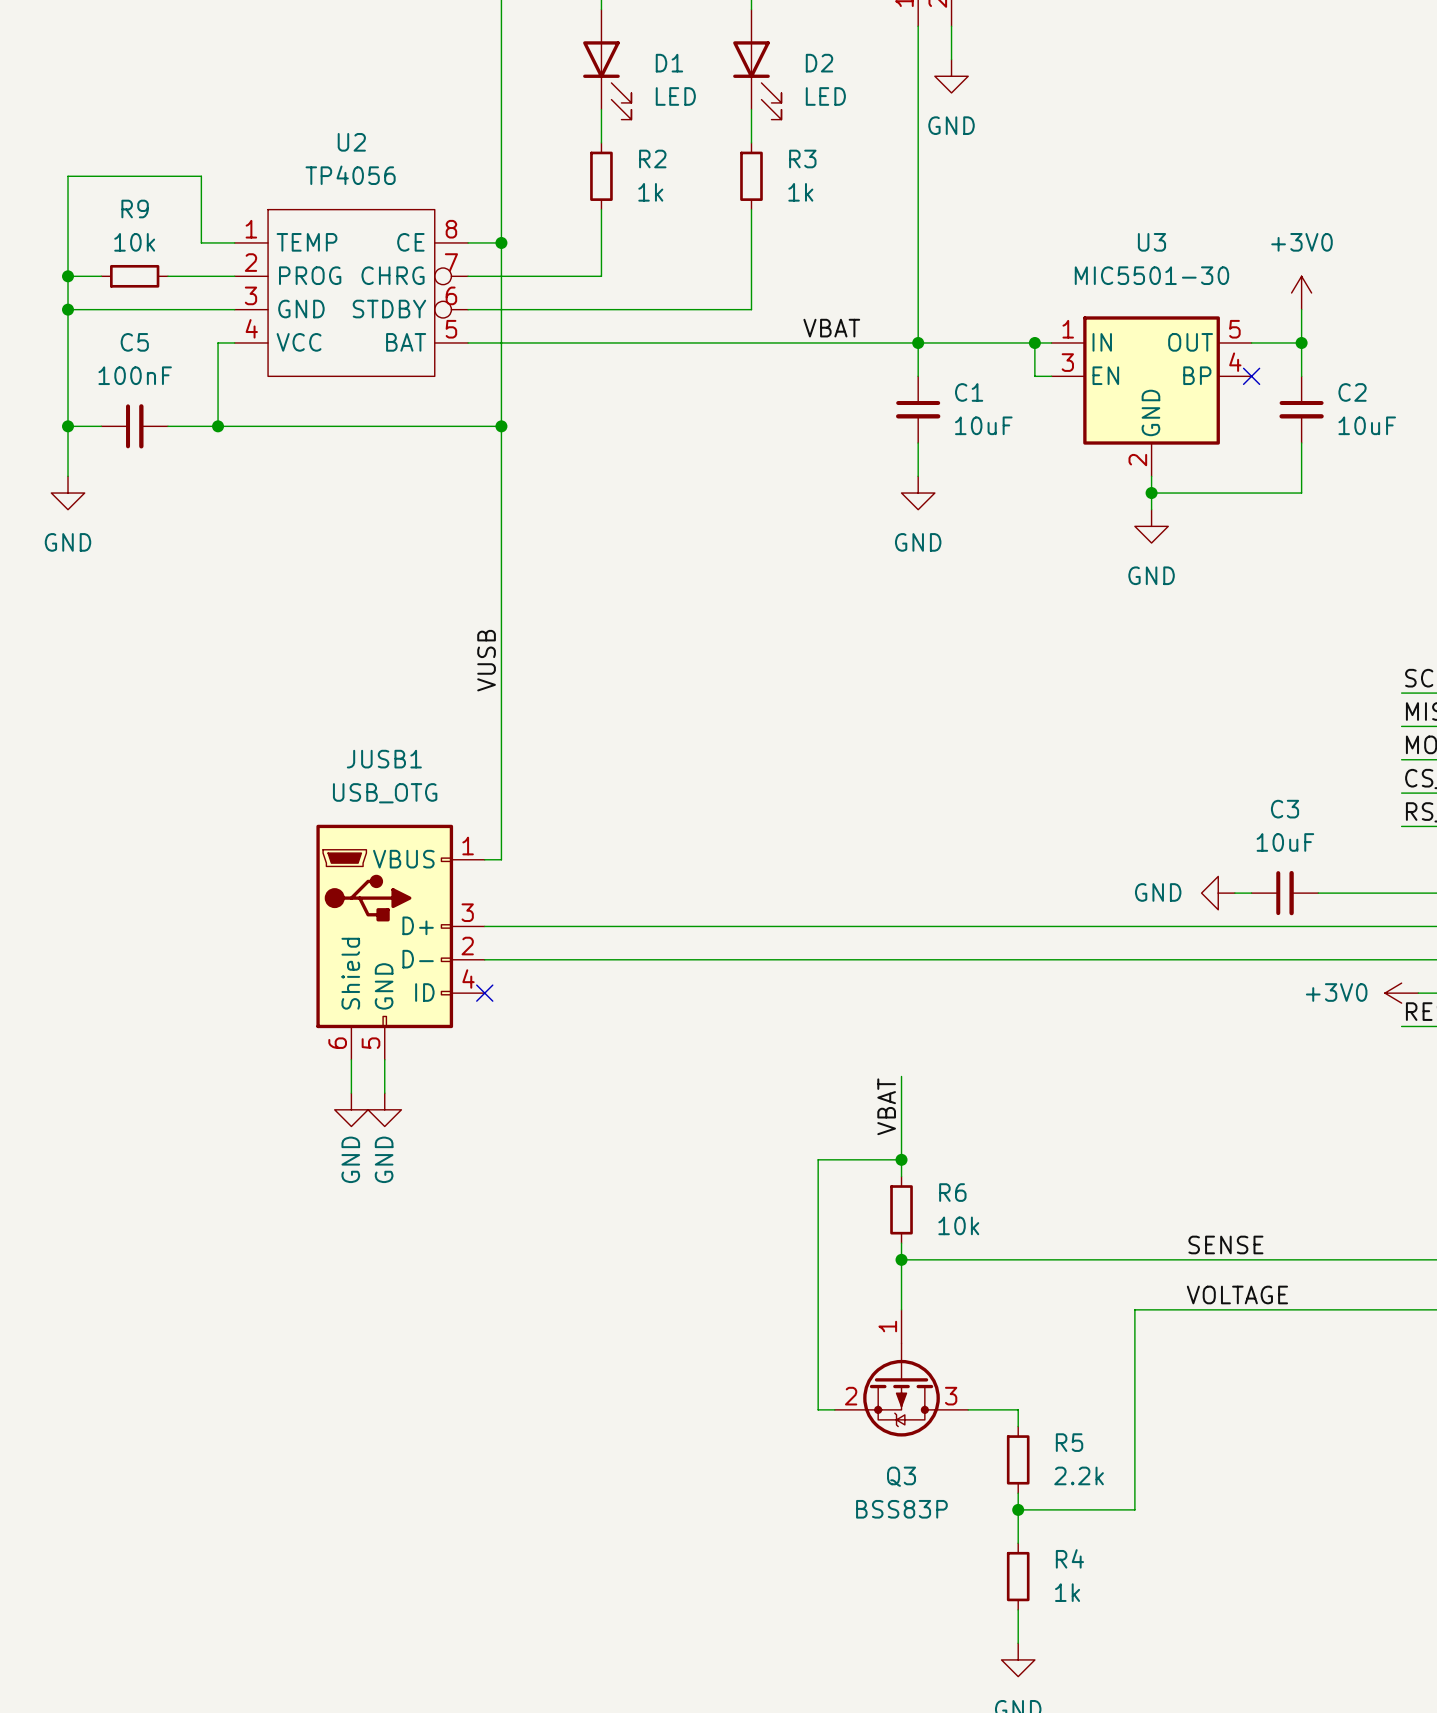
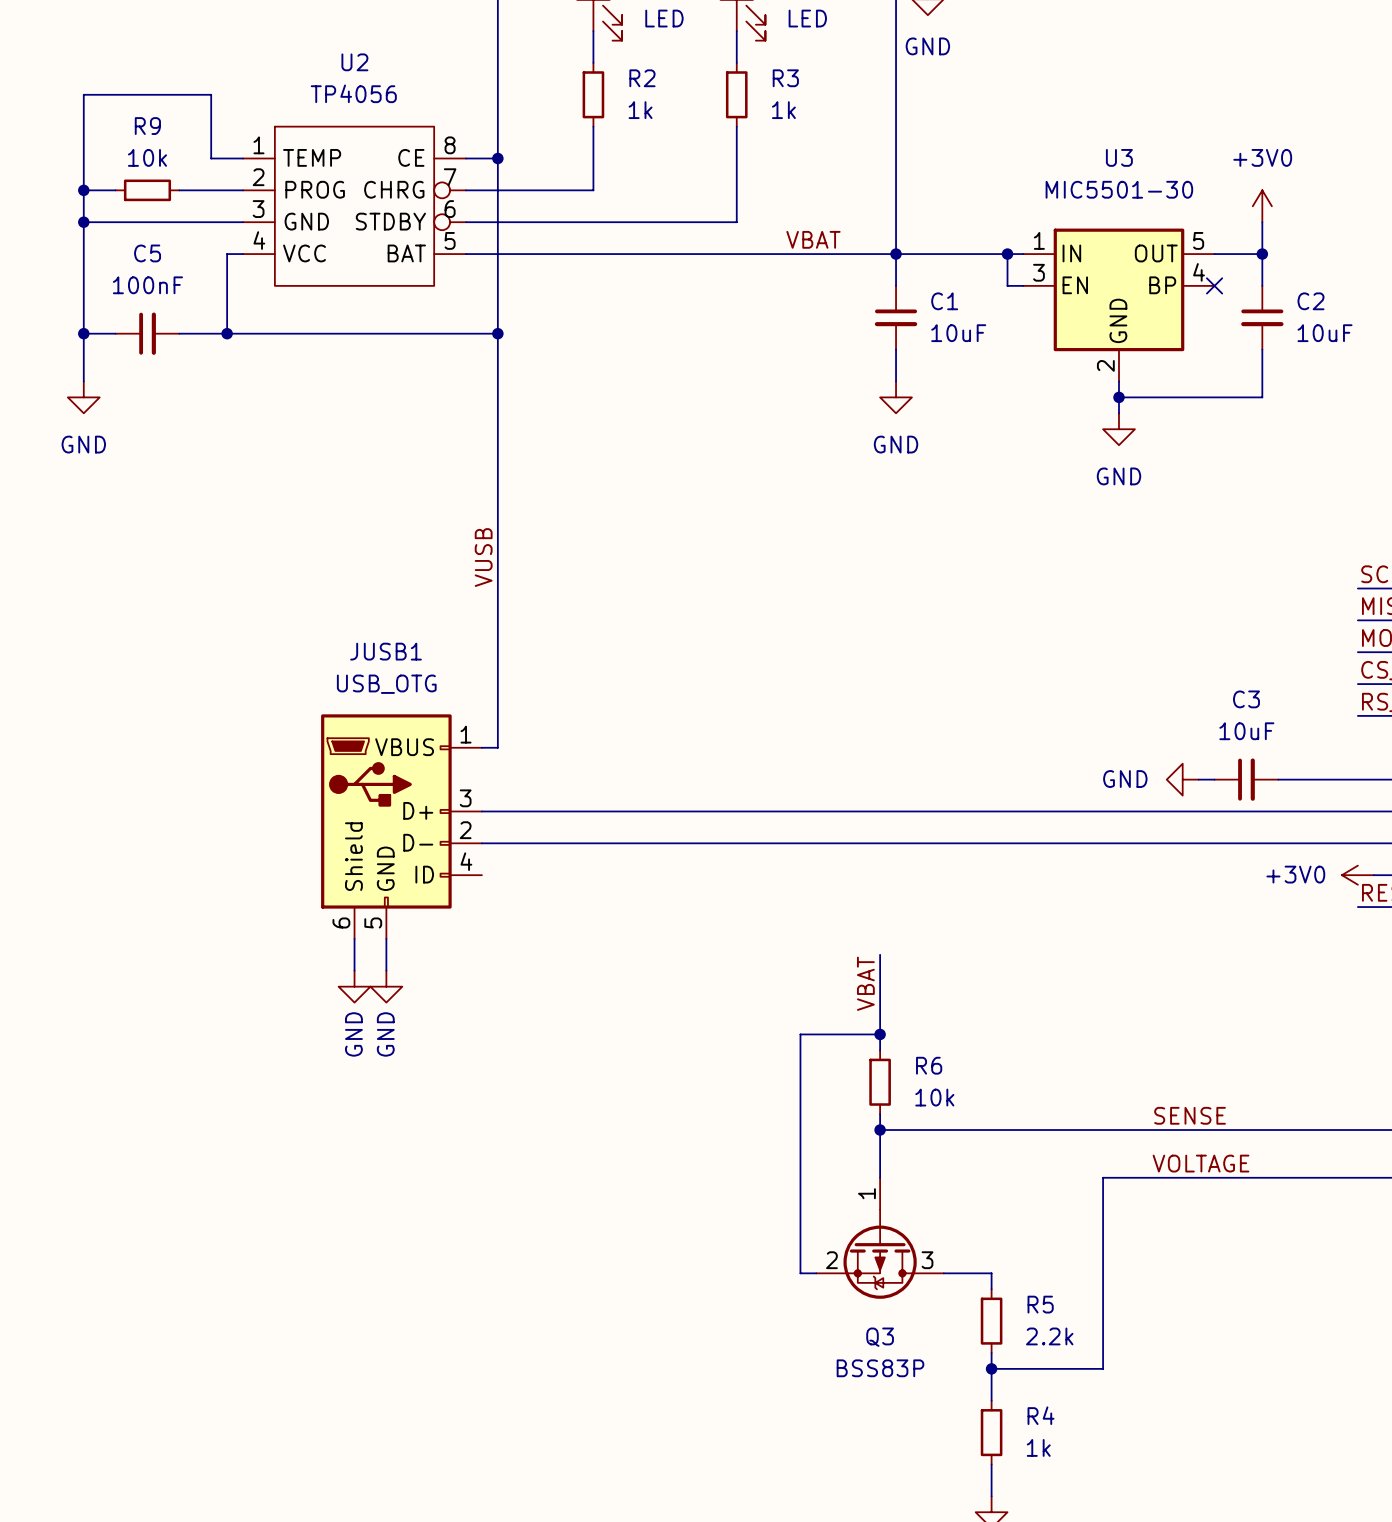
no-connect mark: (484, 993) -> none

